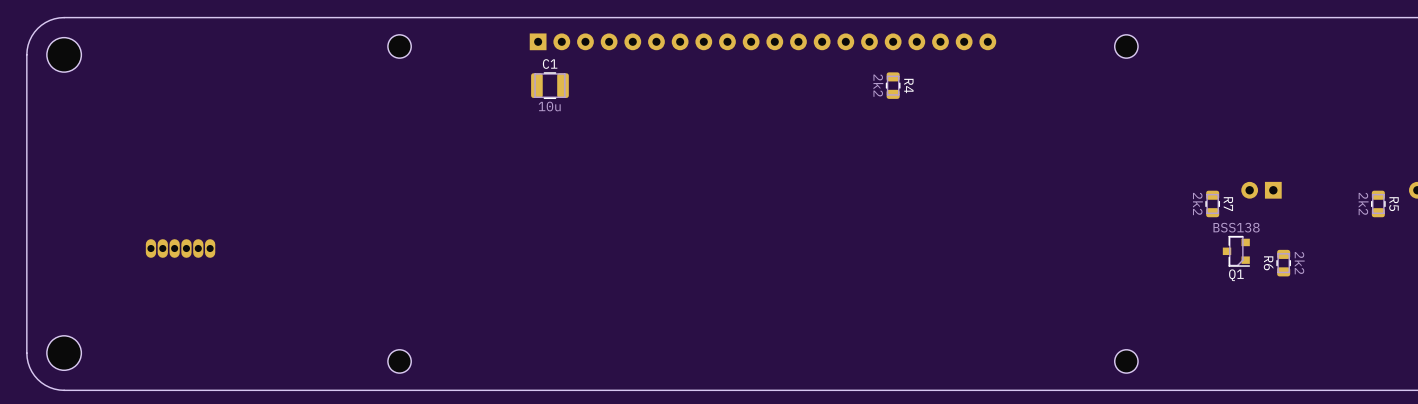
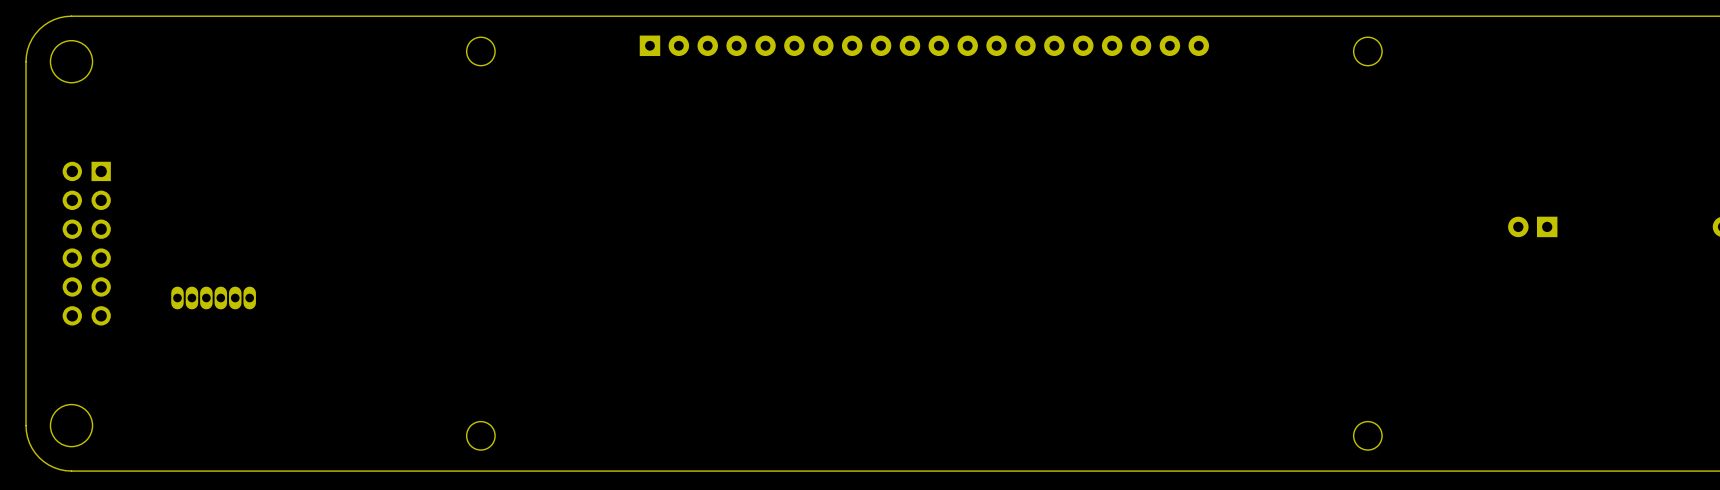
C1: 10u (549, 85) -> none
R4: 2k2 (893, 85) -> none
part: none -> (86, 243)
R7: 2k2 (1212, 203) -> none
R5: 2k2 (1378, 203) -> none
Q1: BSS138 (1236, 251) -> none
R6: 2k2 (1283, 263) -> none

